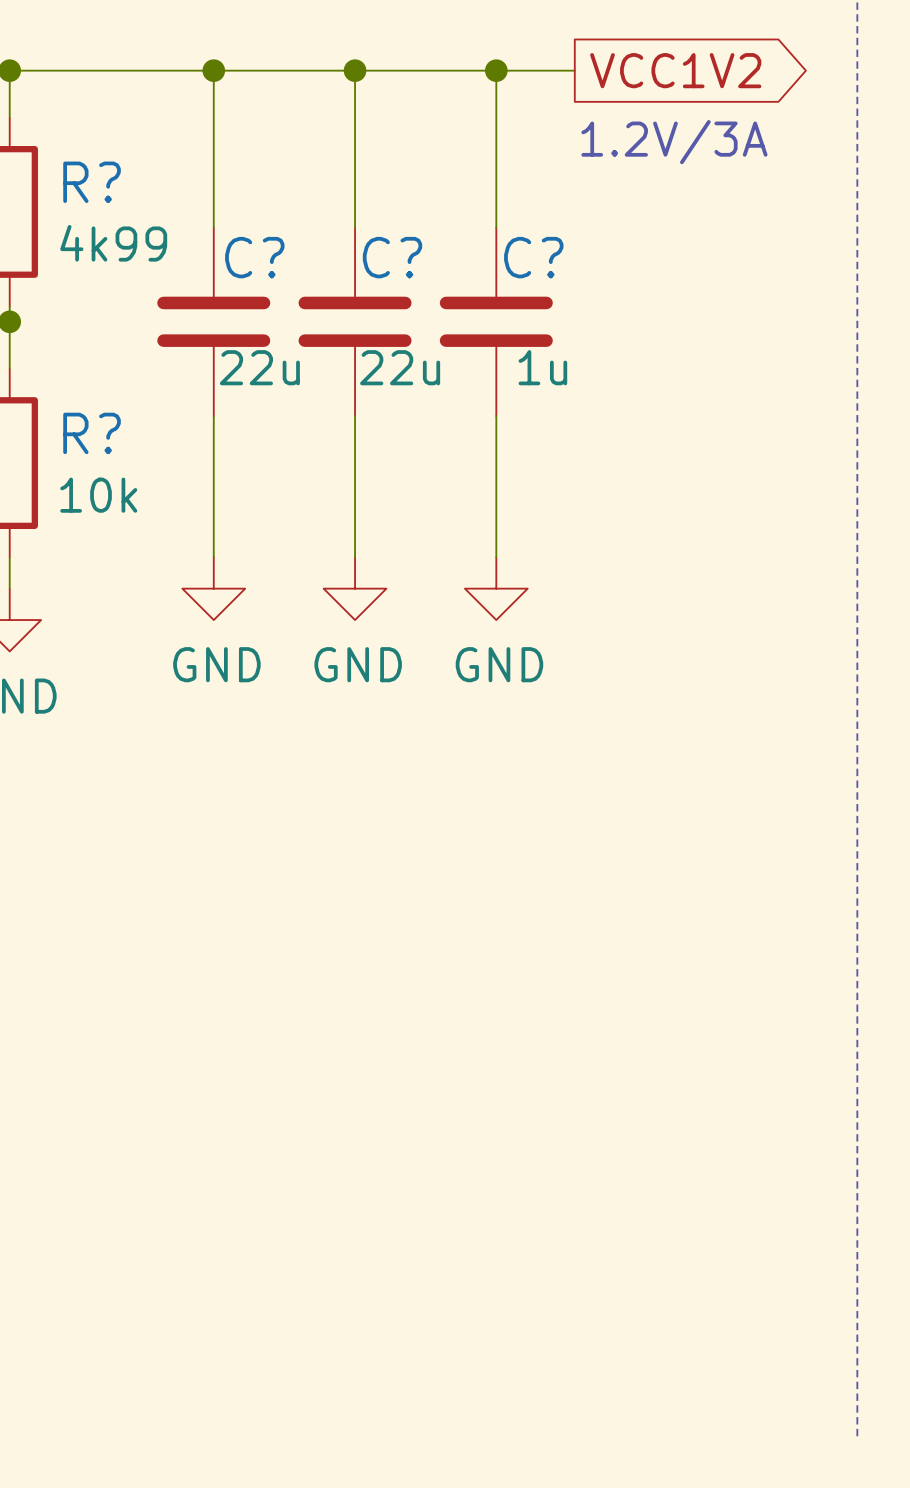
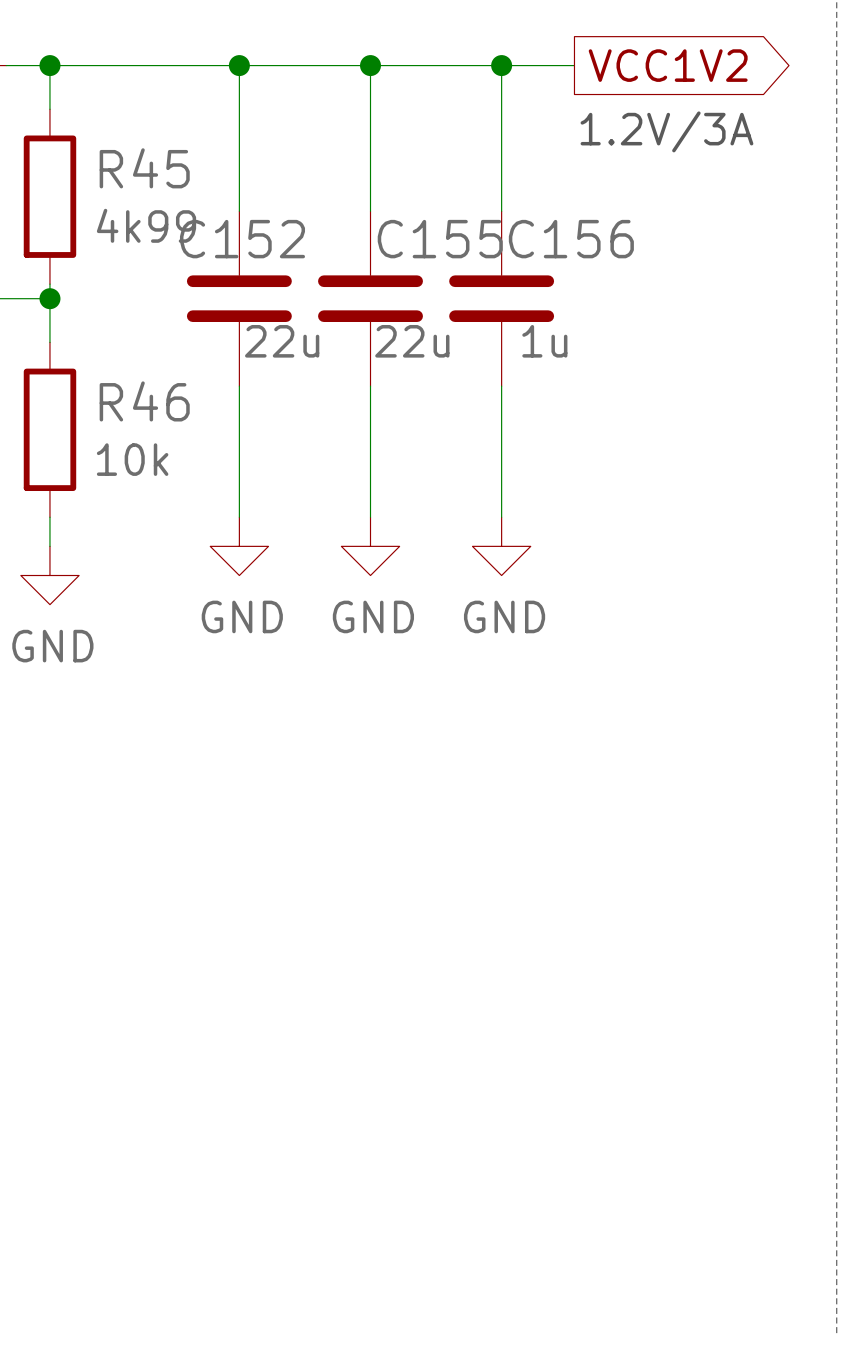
R? name: R? (92, 182) -> R45 (144, 168)
C? name: C? (254, 257) -> C152 (242, 239)
C? name: C? (392, 257) -> C155 (440, 239)
C? name: C? (533, 257) -> C156 (571, 239)
R? name: R? (92, 433) -> R46 (144, 401)

